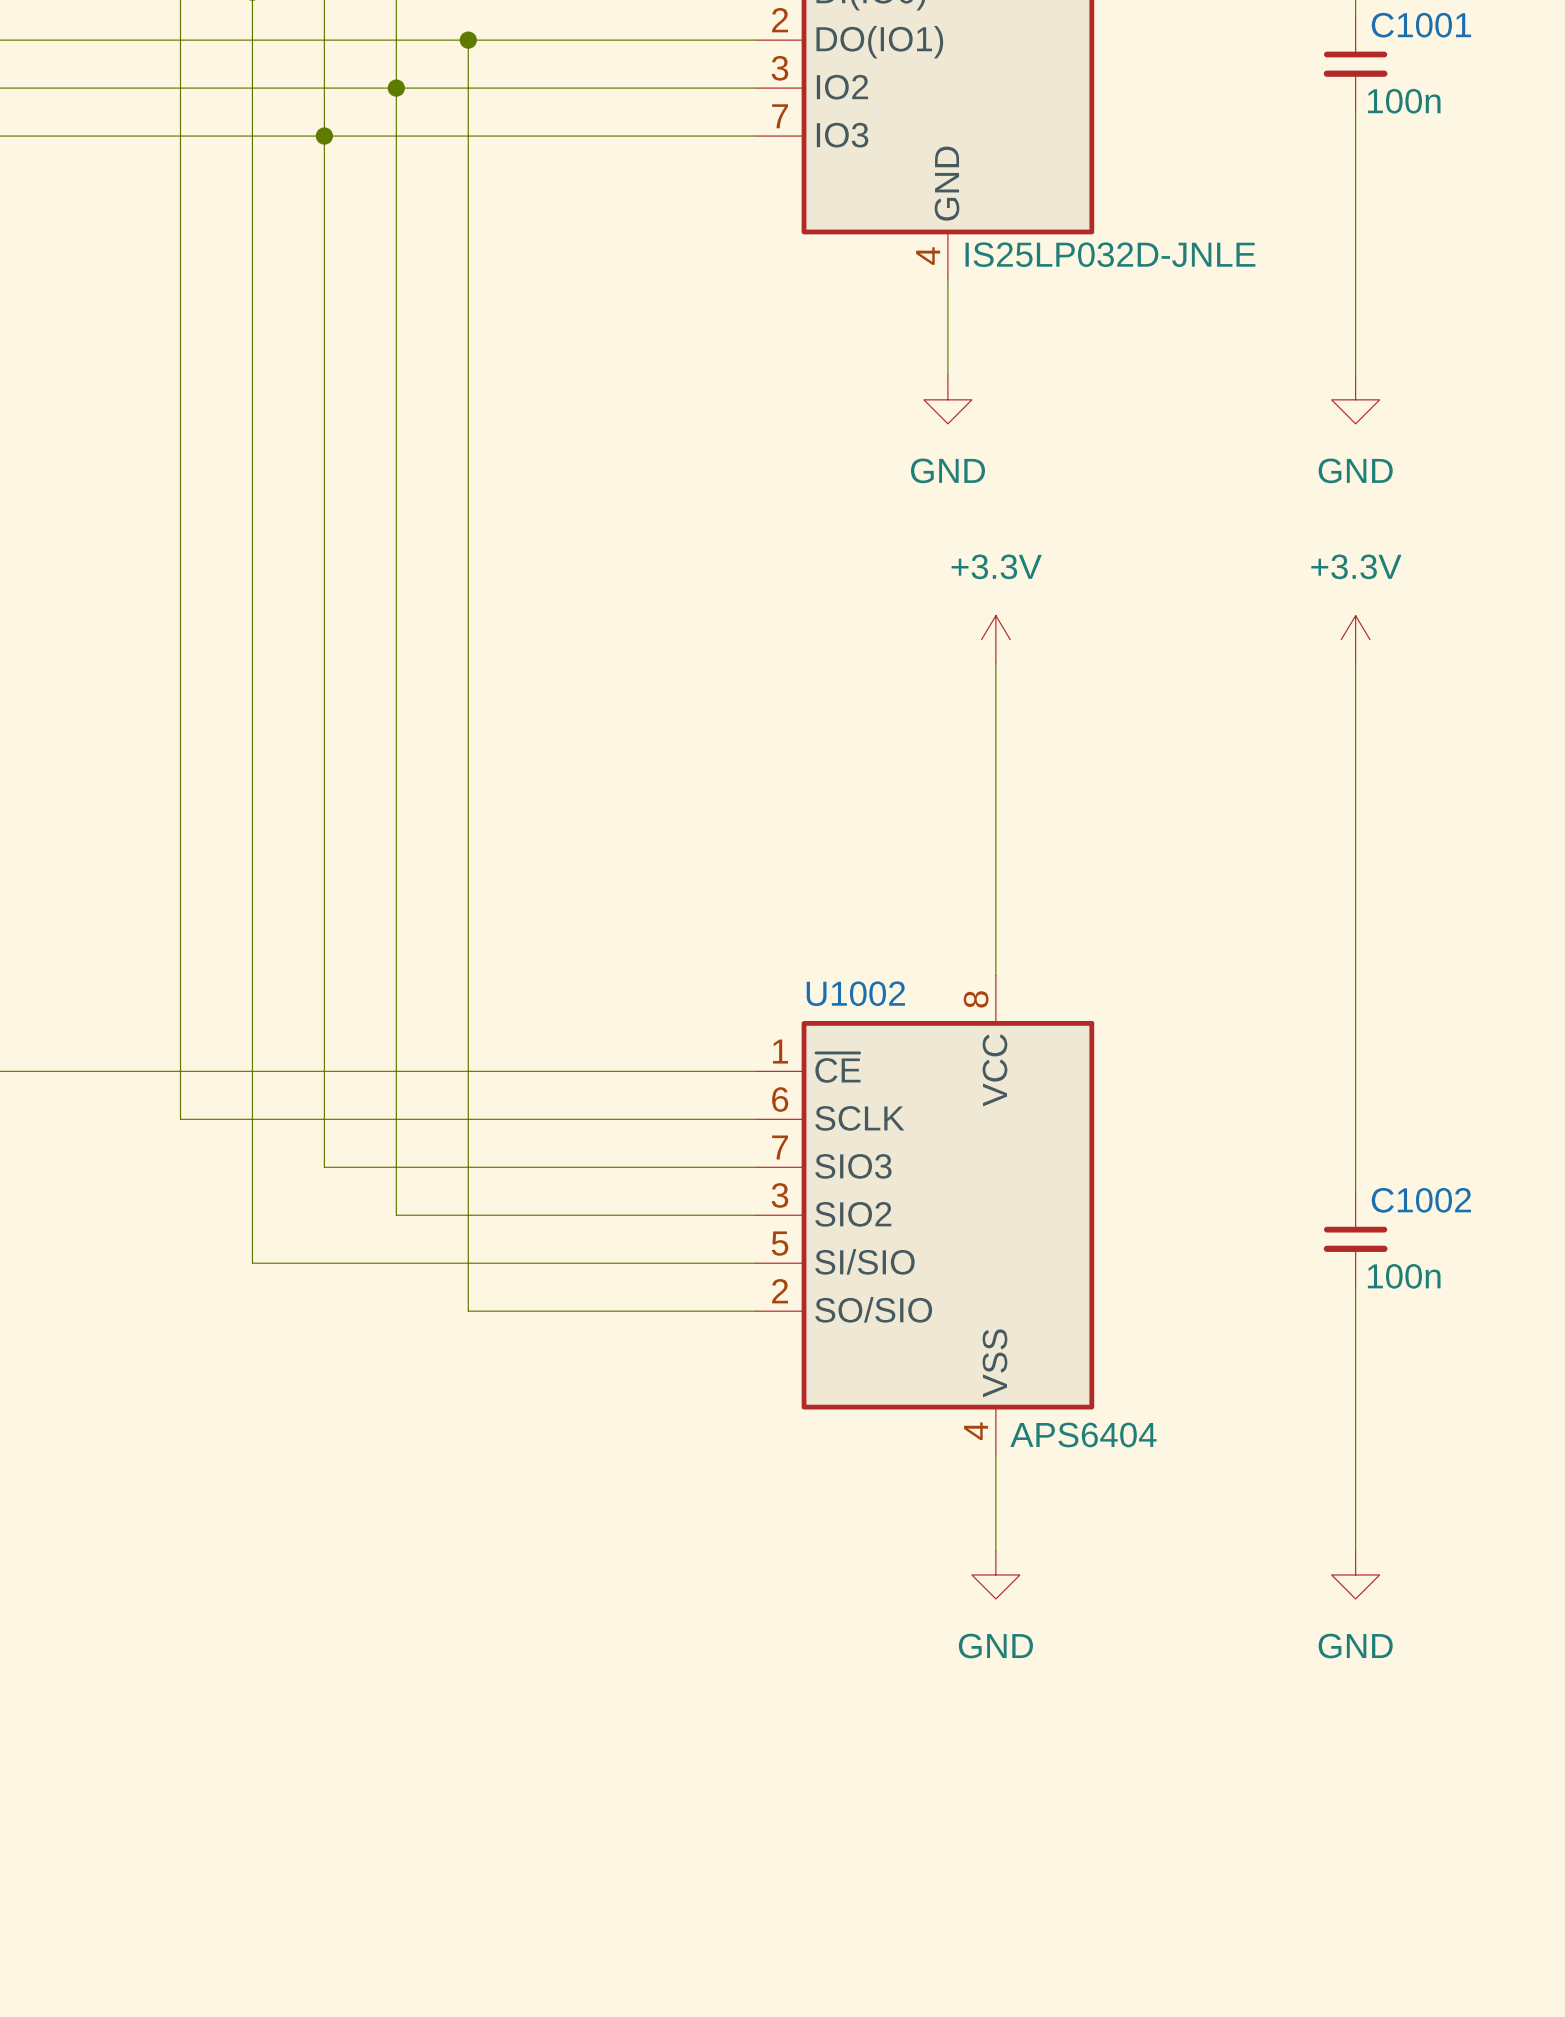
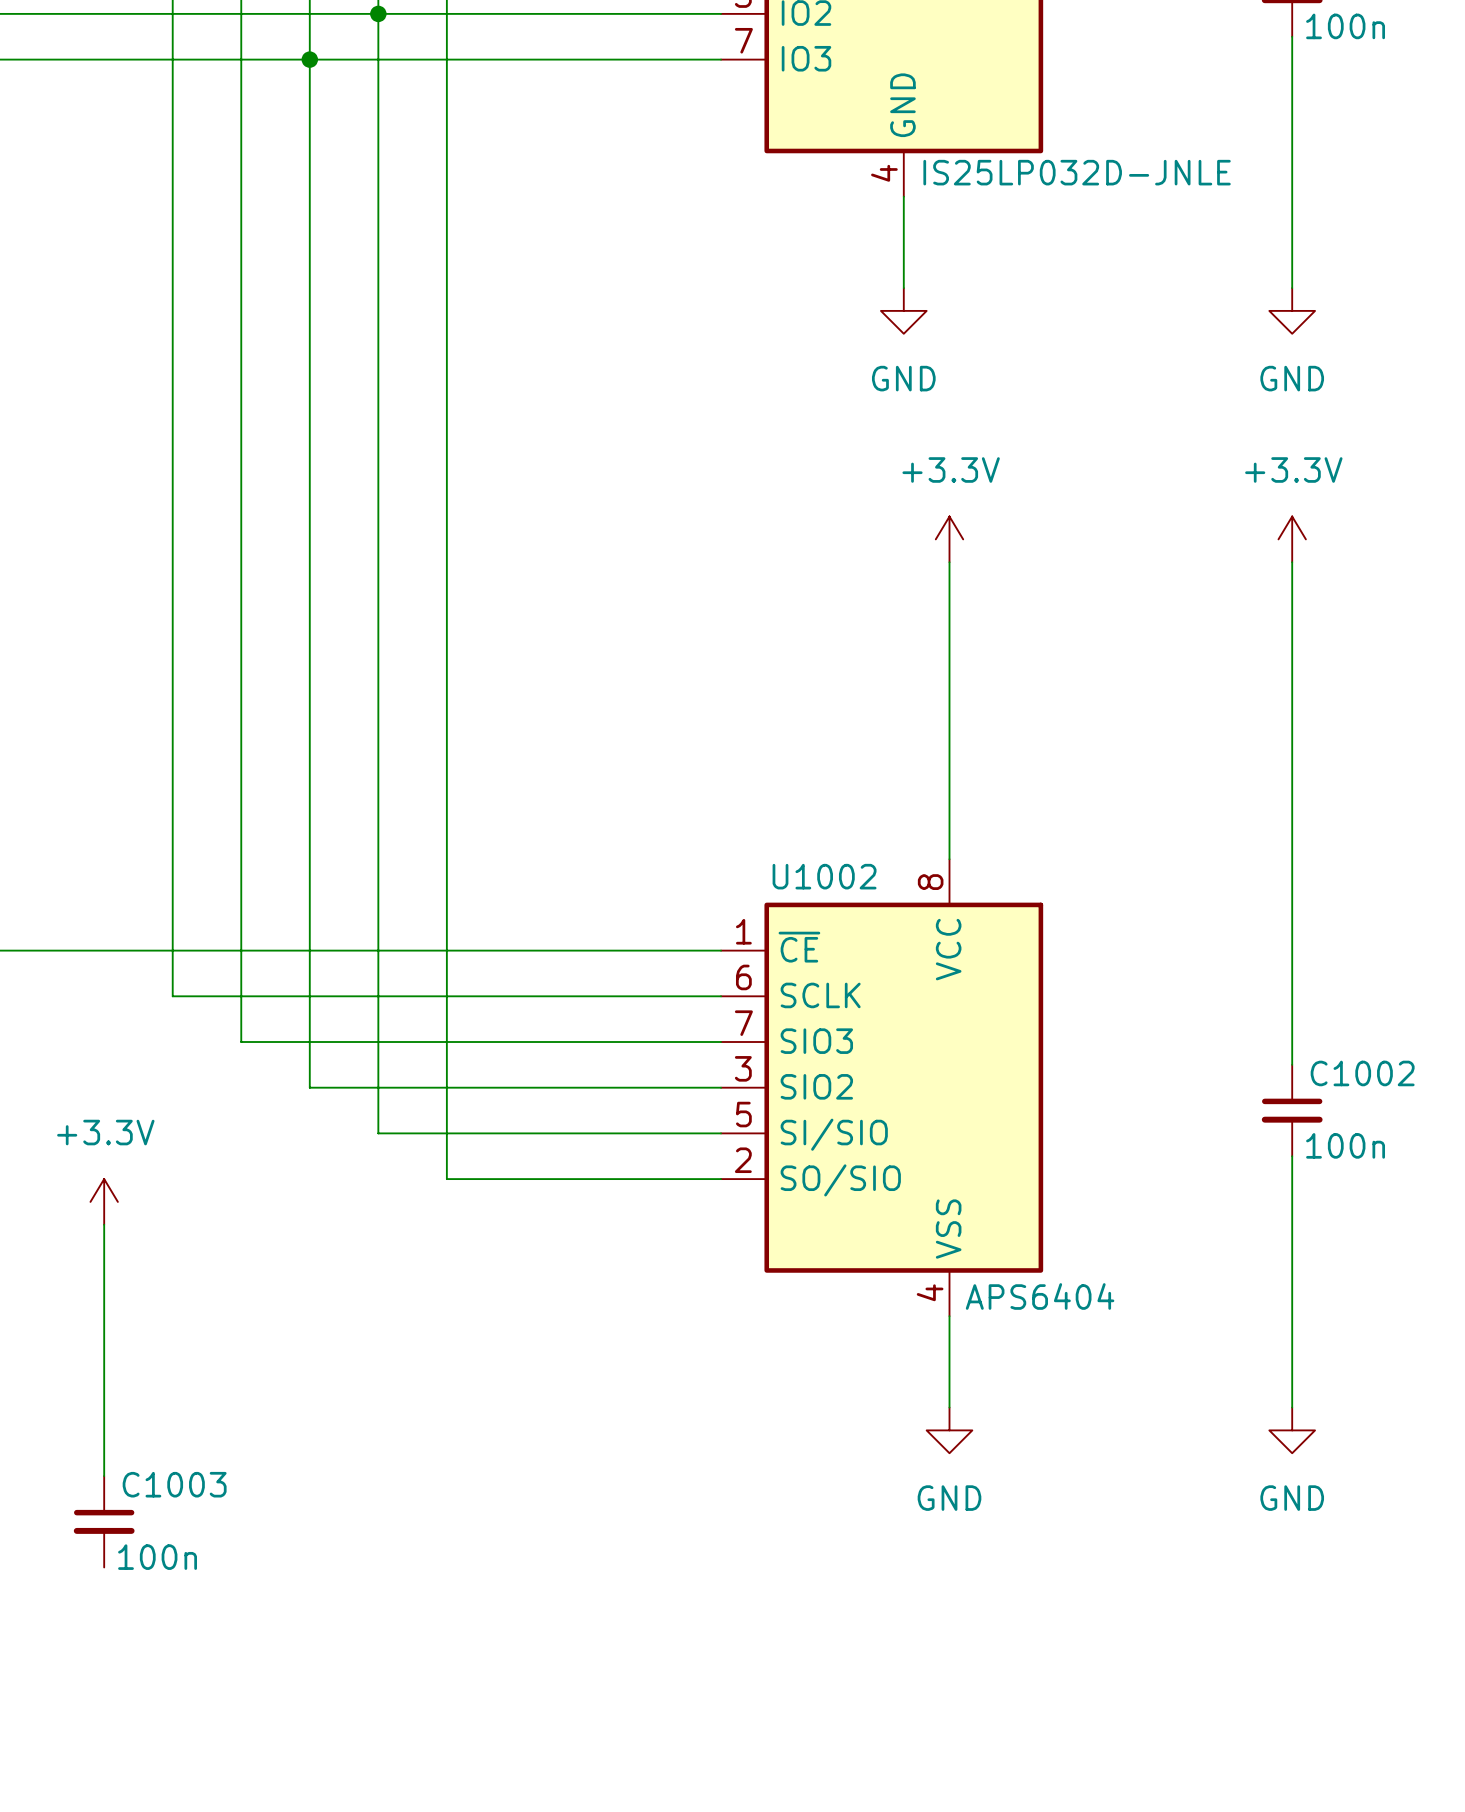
wire: (252, 1167) (252, 1263) (396, 1263) -> (241, 1042) (309, 1042) (309, 1087) (378, 1087) (378, 1133)
power symbol: none -> +3.3V (104, 1201)
wire: none -> (104, 1224) (104, 1476)
C1003: none -> 100n (104, 1521)

